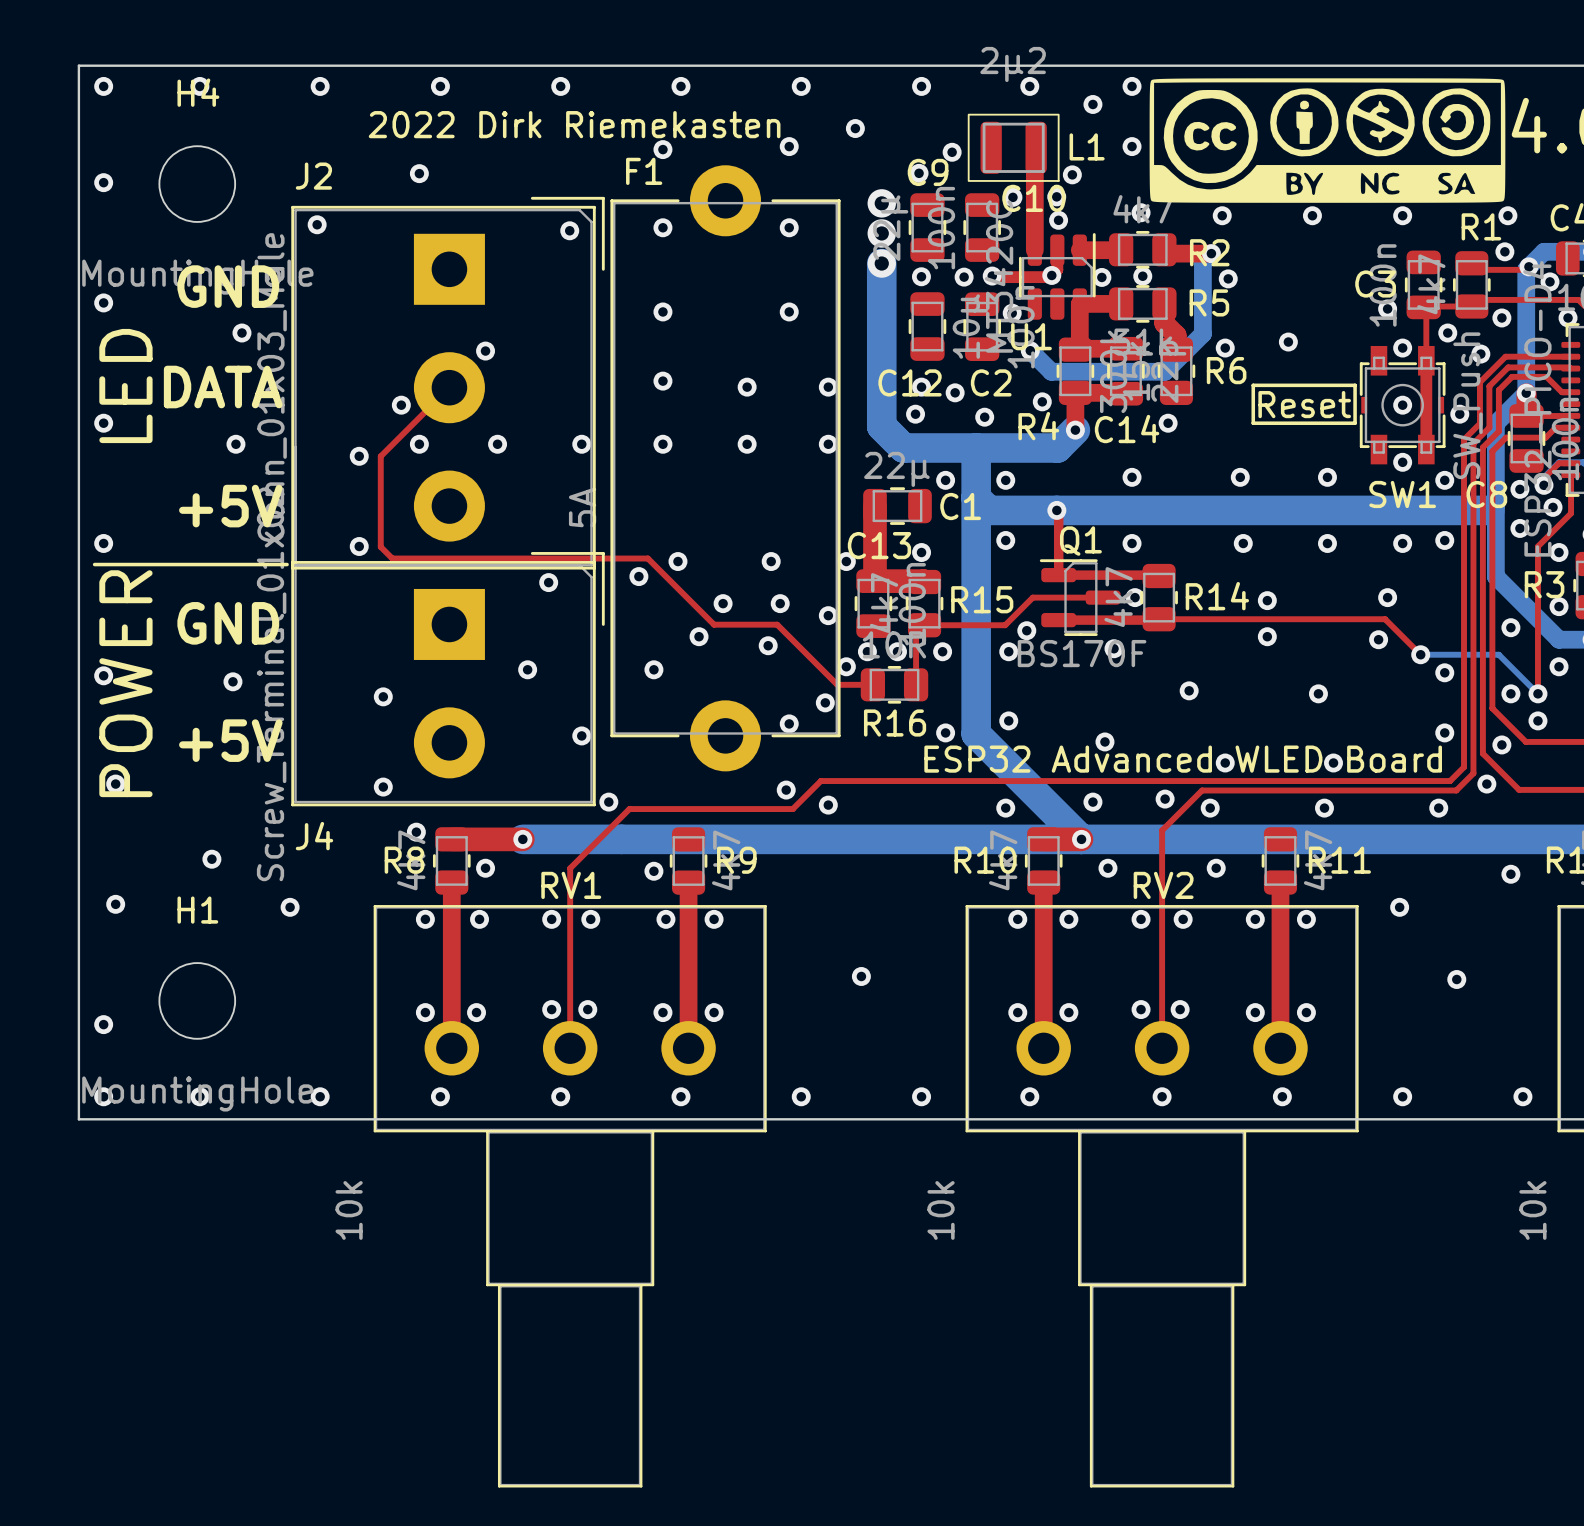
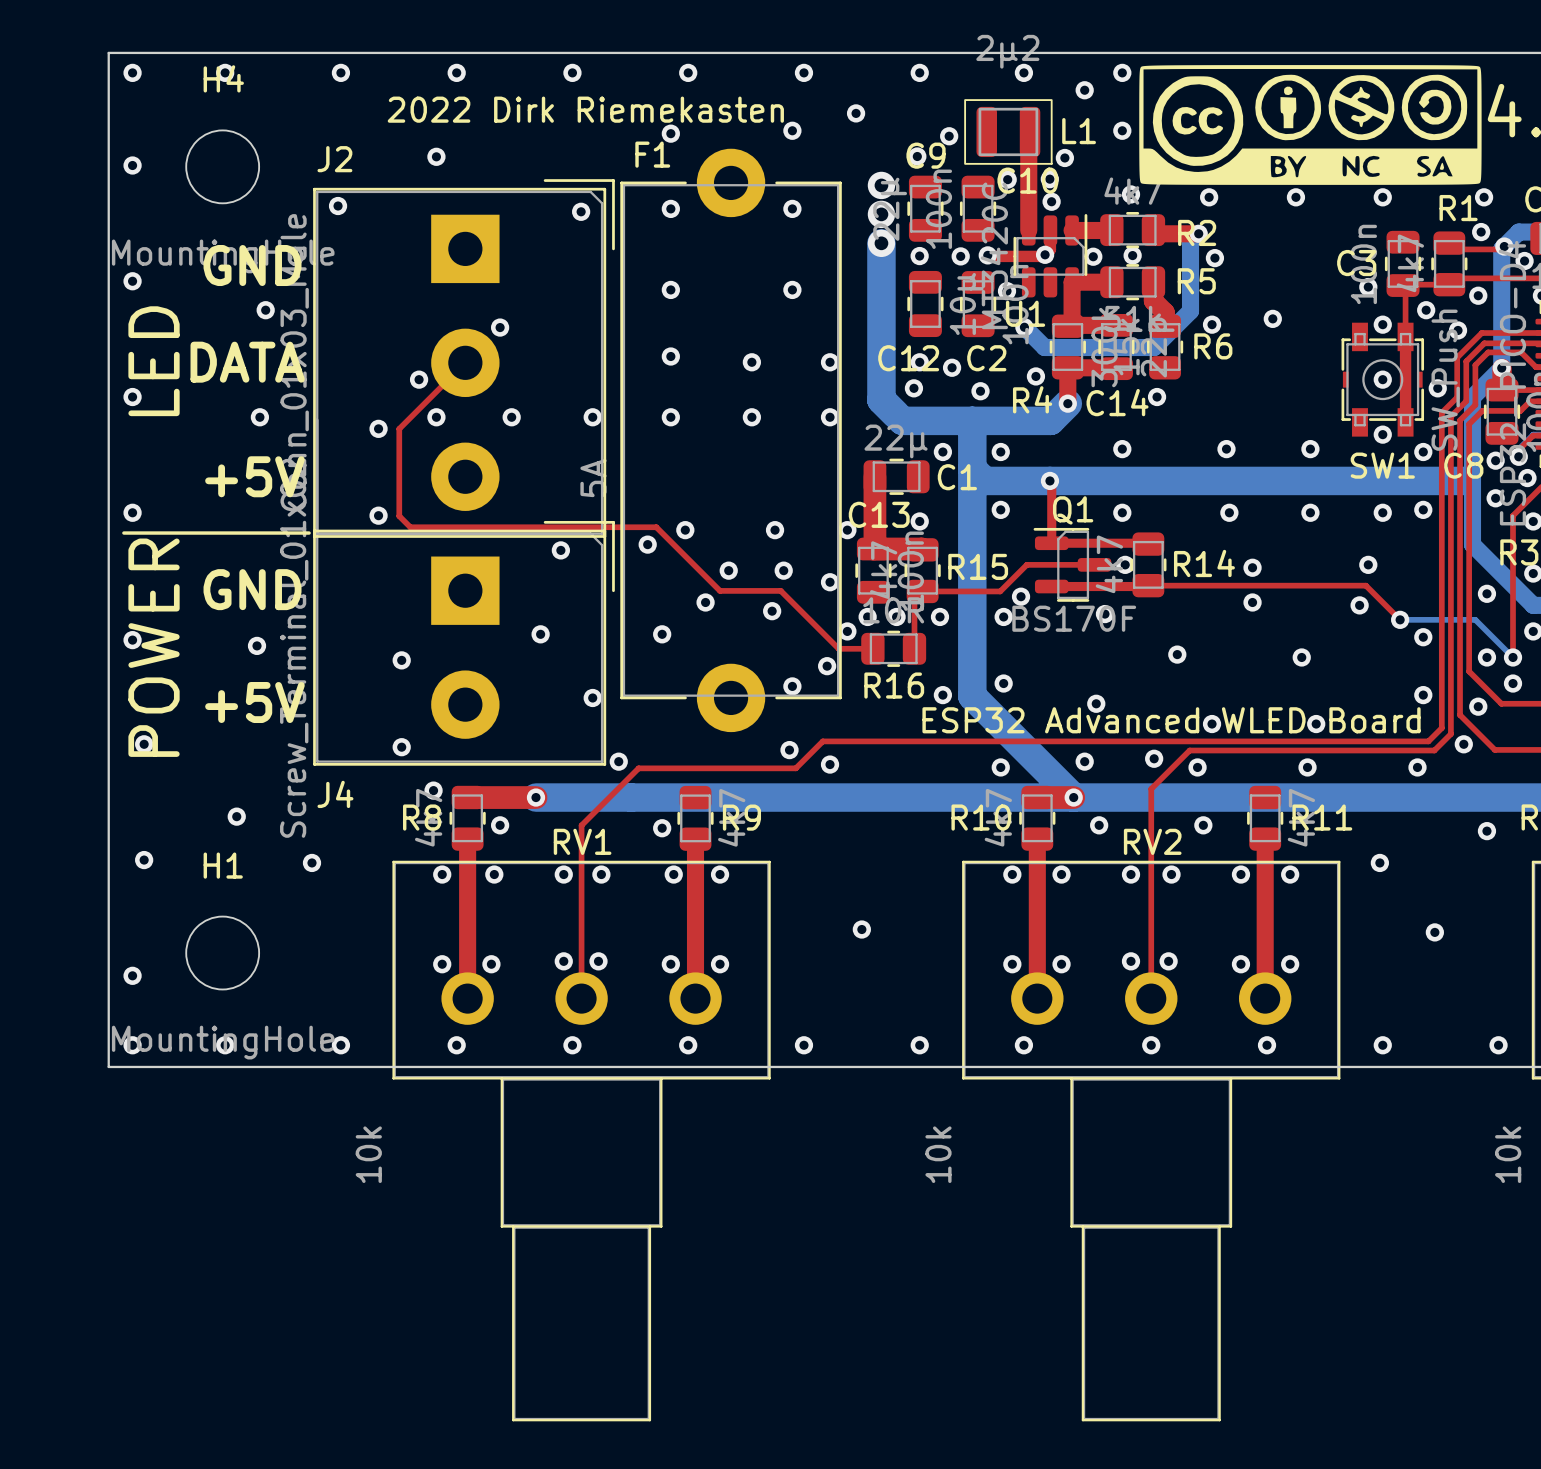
line: (1253, 385) (1355, 385) (1355, 423) (1253, 423) (1253, 385) -> none
text: Reset (1304, 404) -> none

